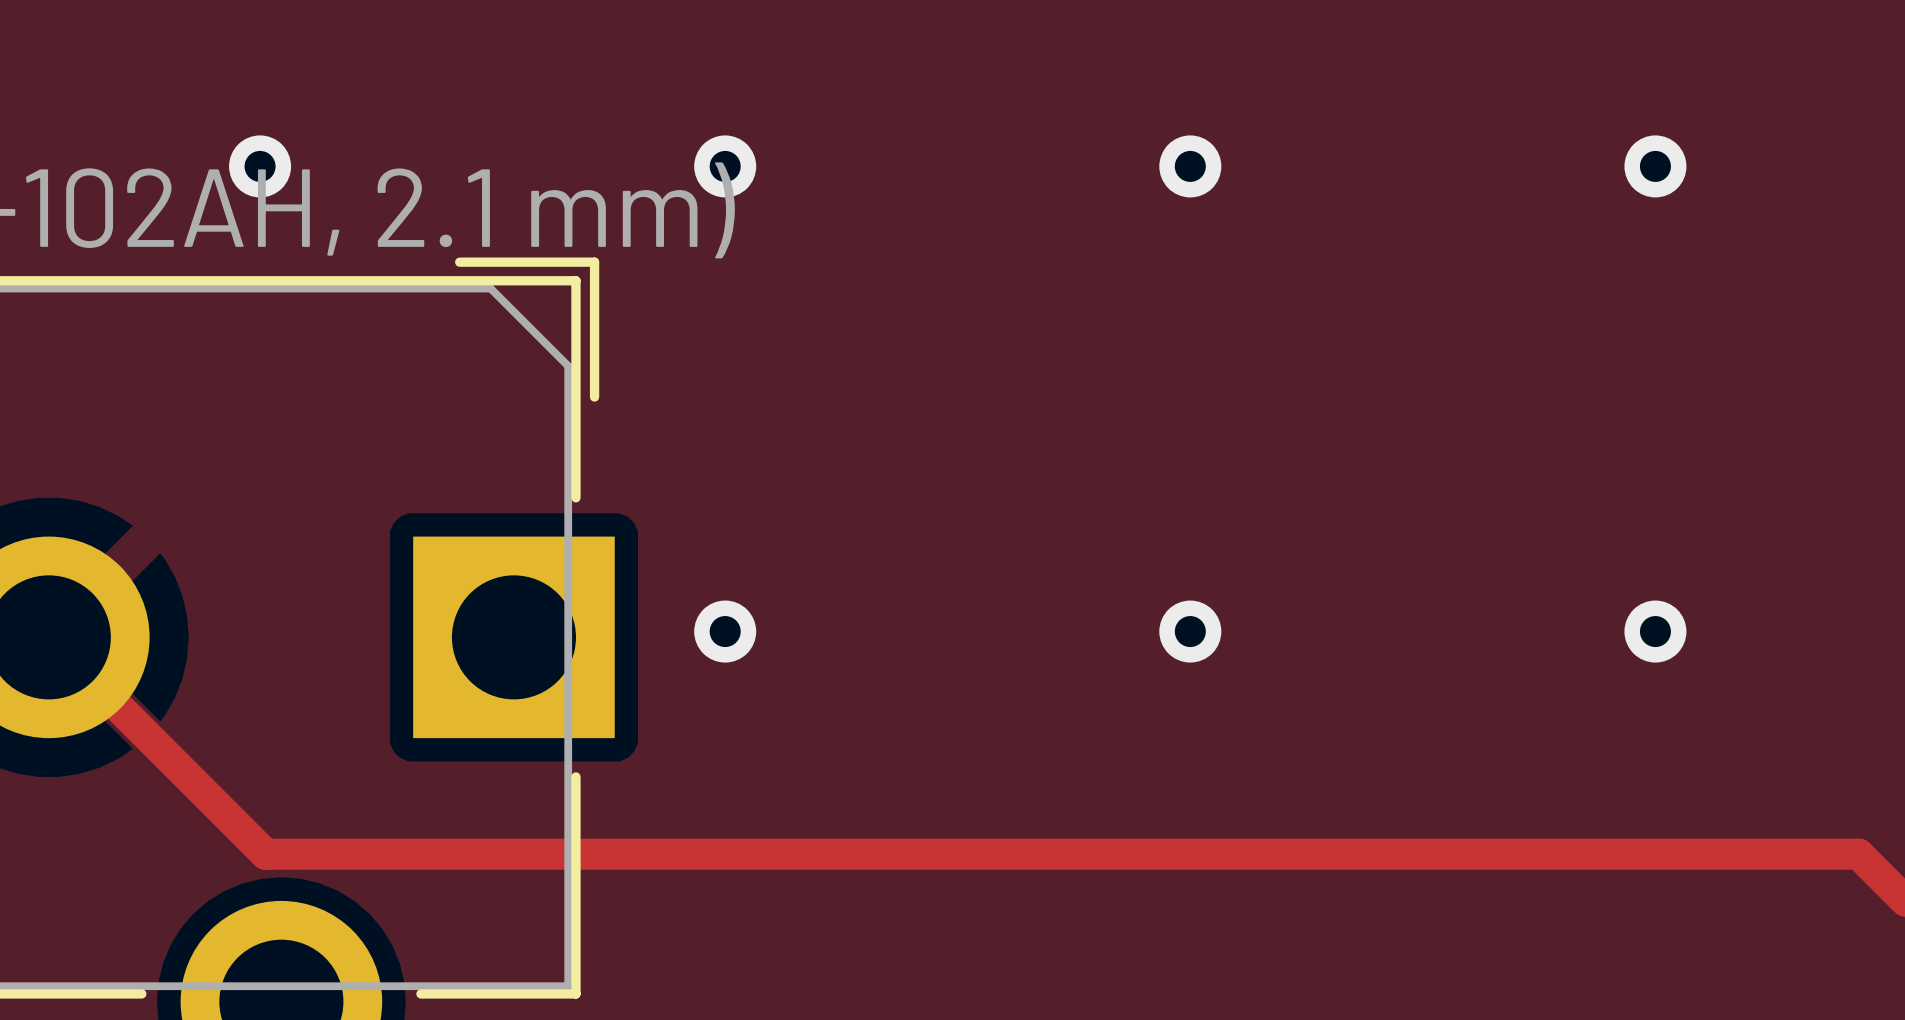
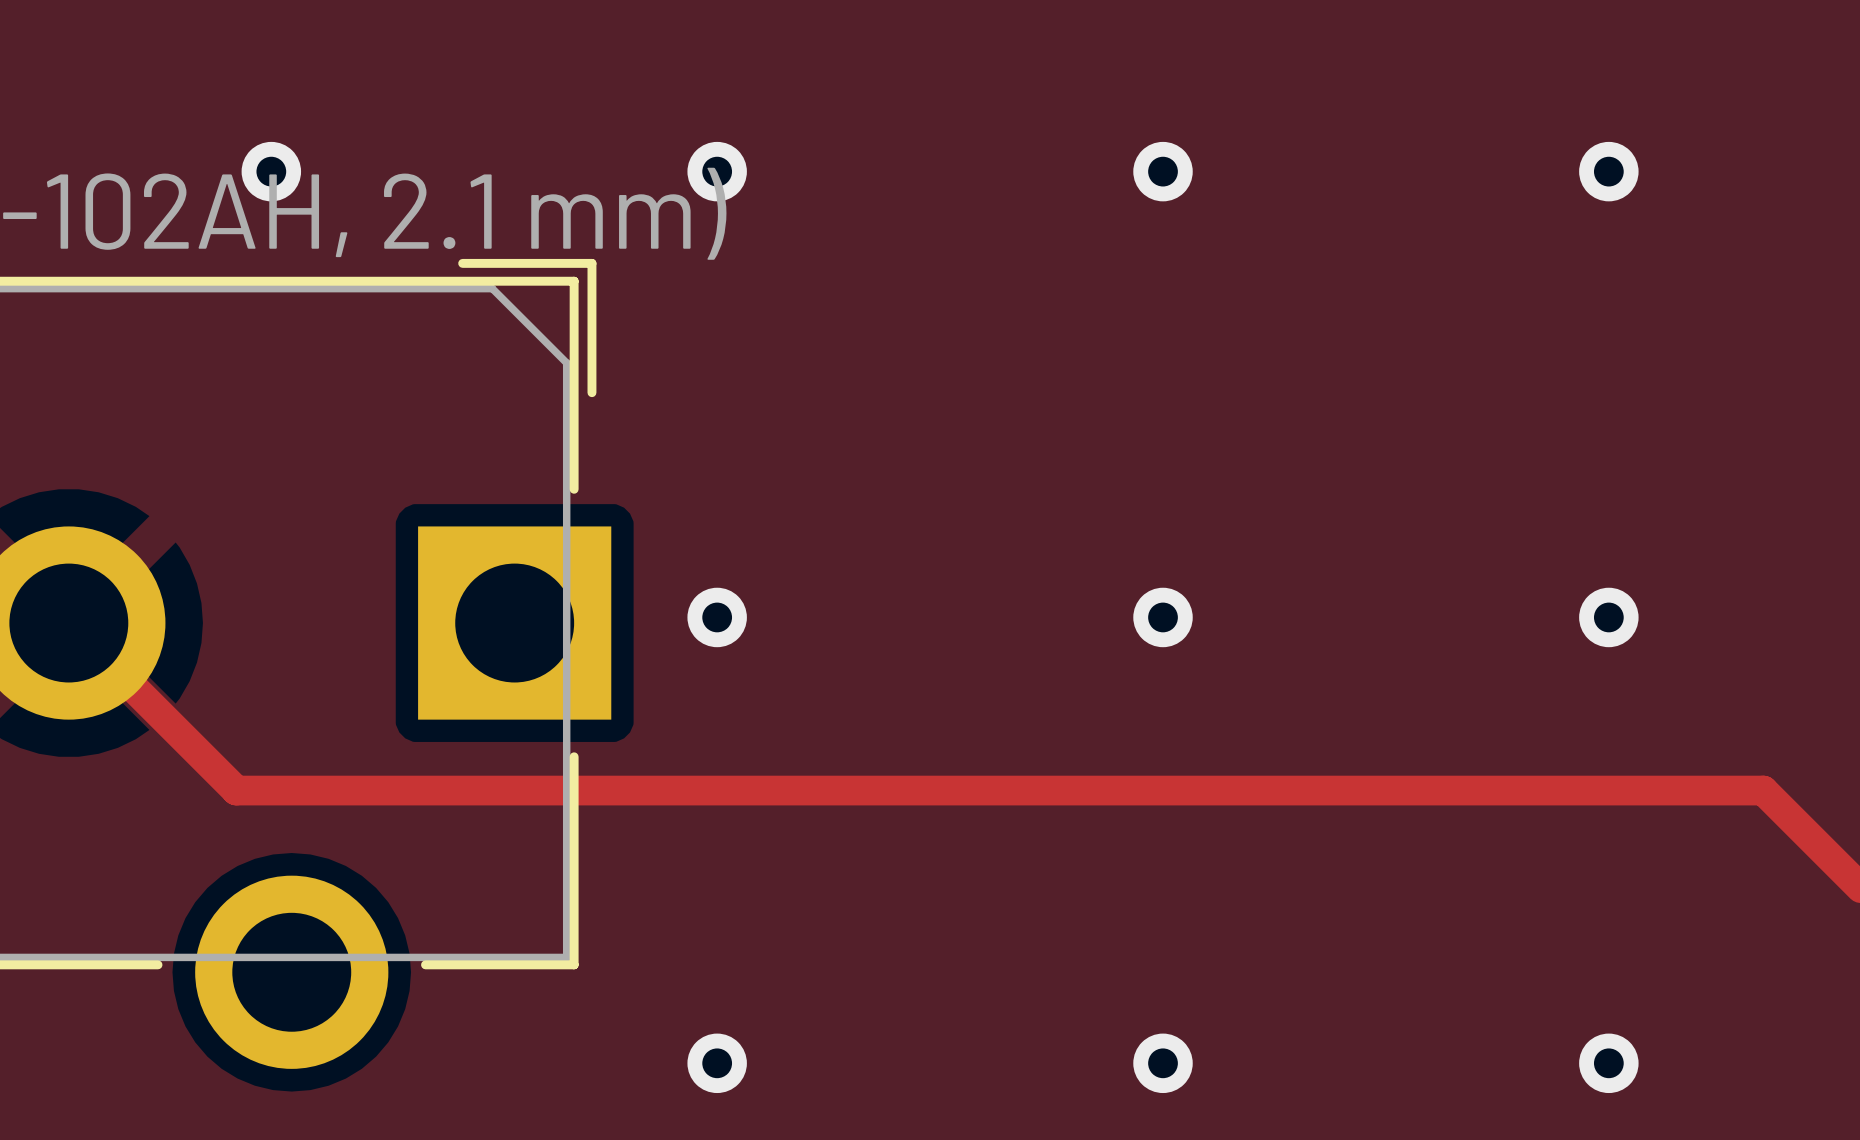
track: (223, 812) (265, 854) (1858, 854) -> (236, 790) (1763, 790) (1803, 830)

